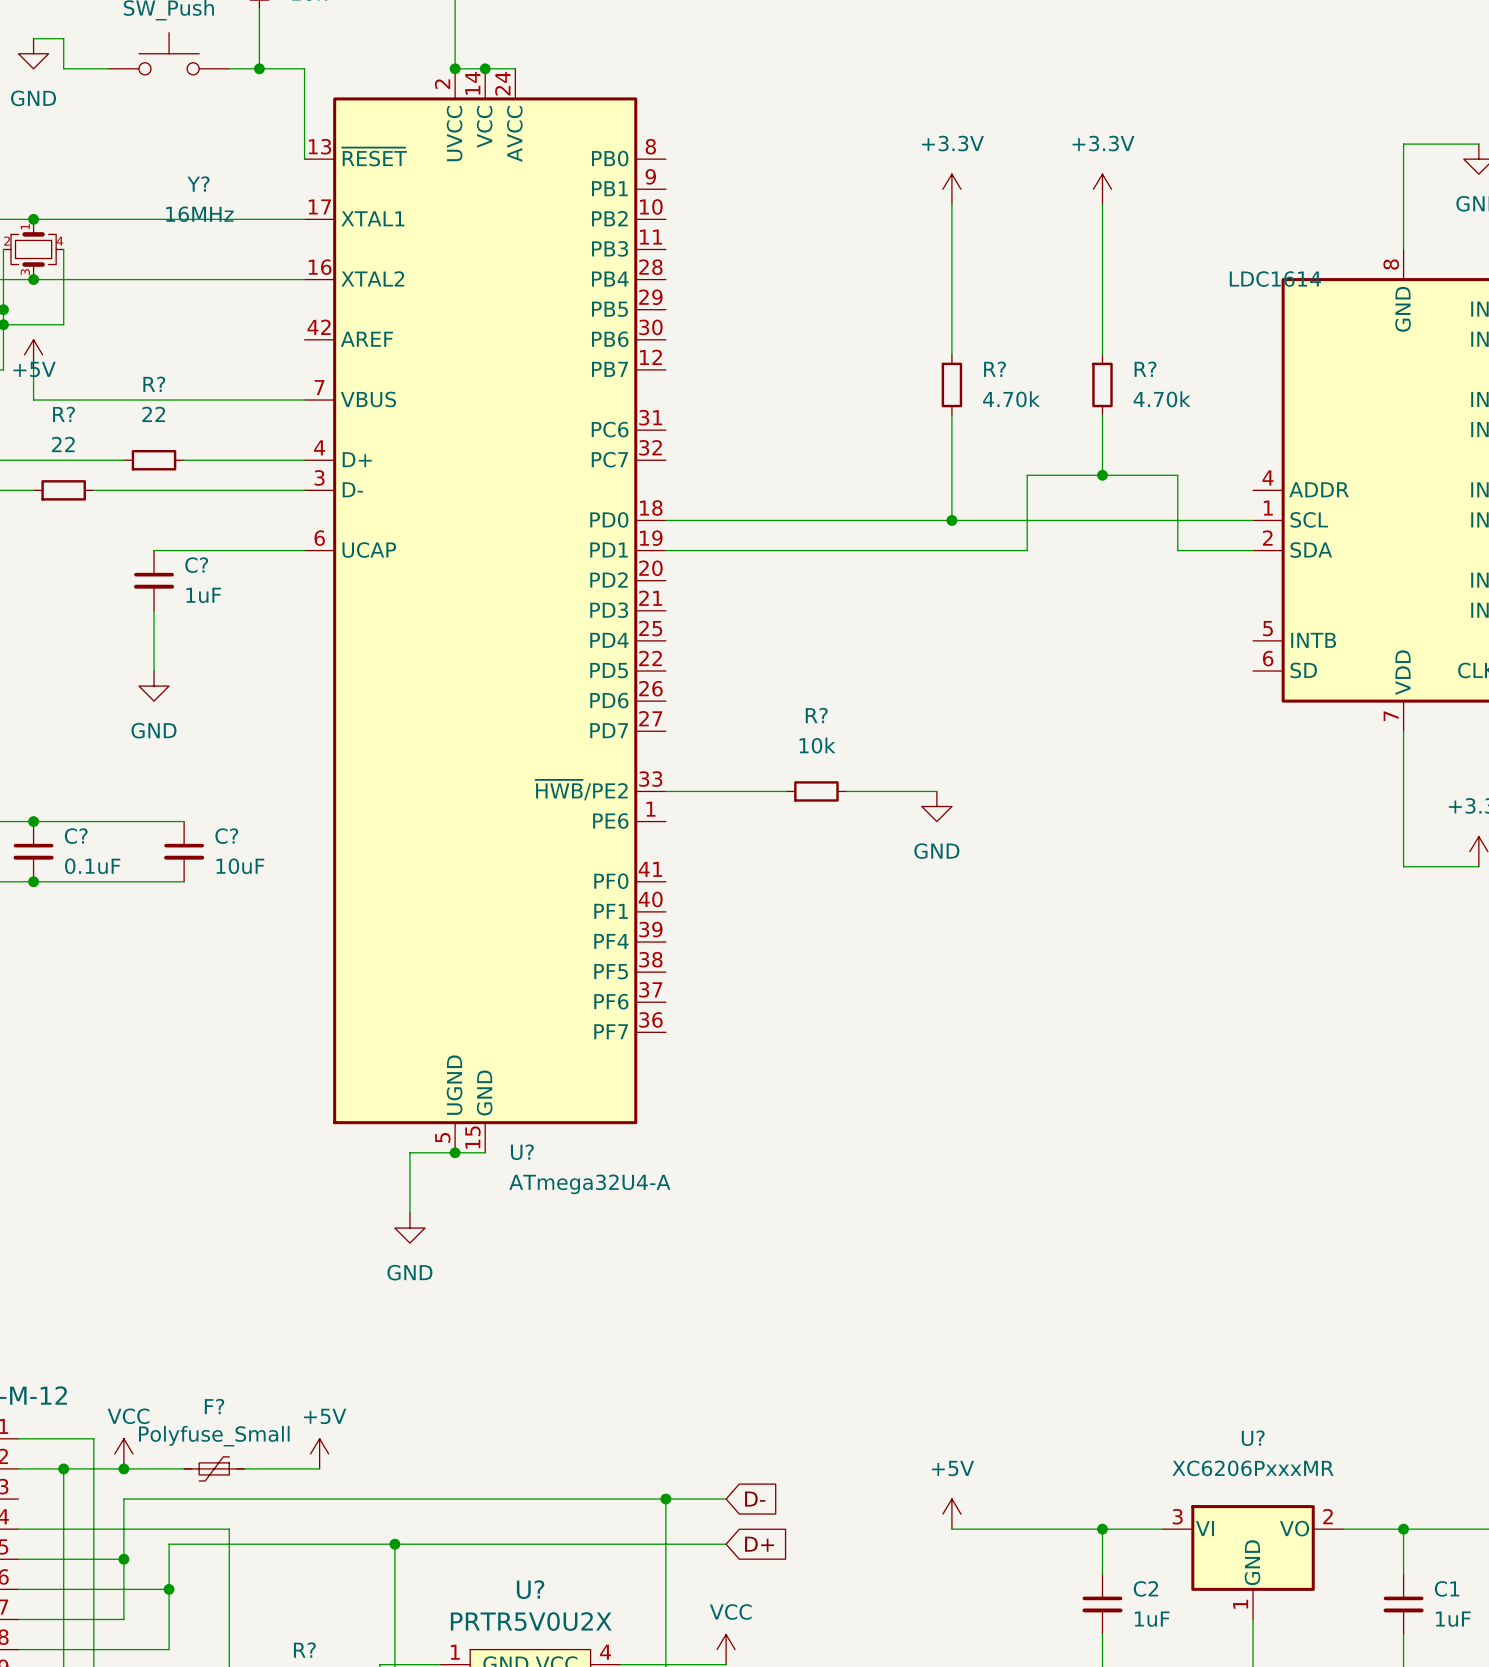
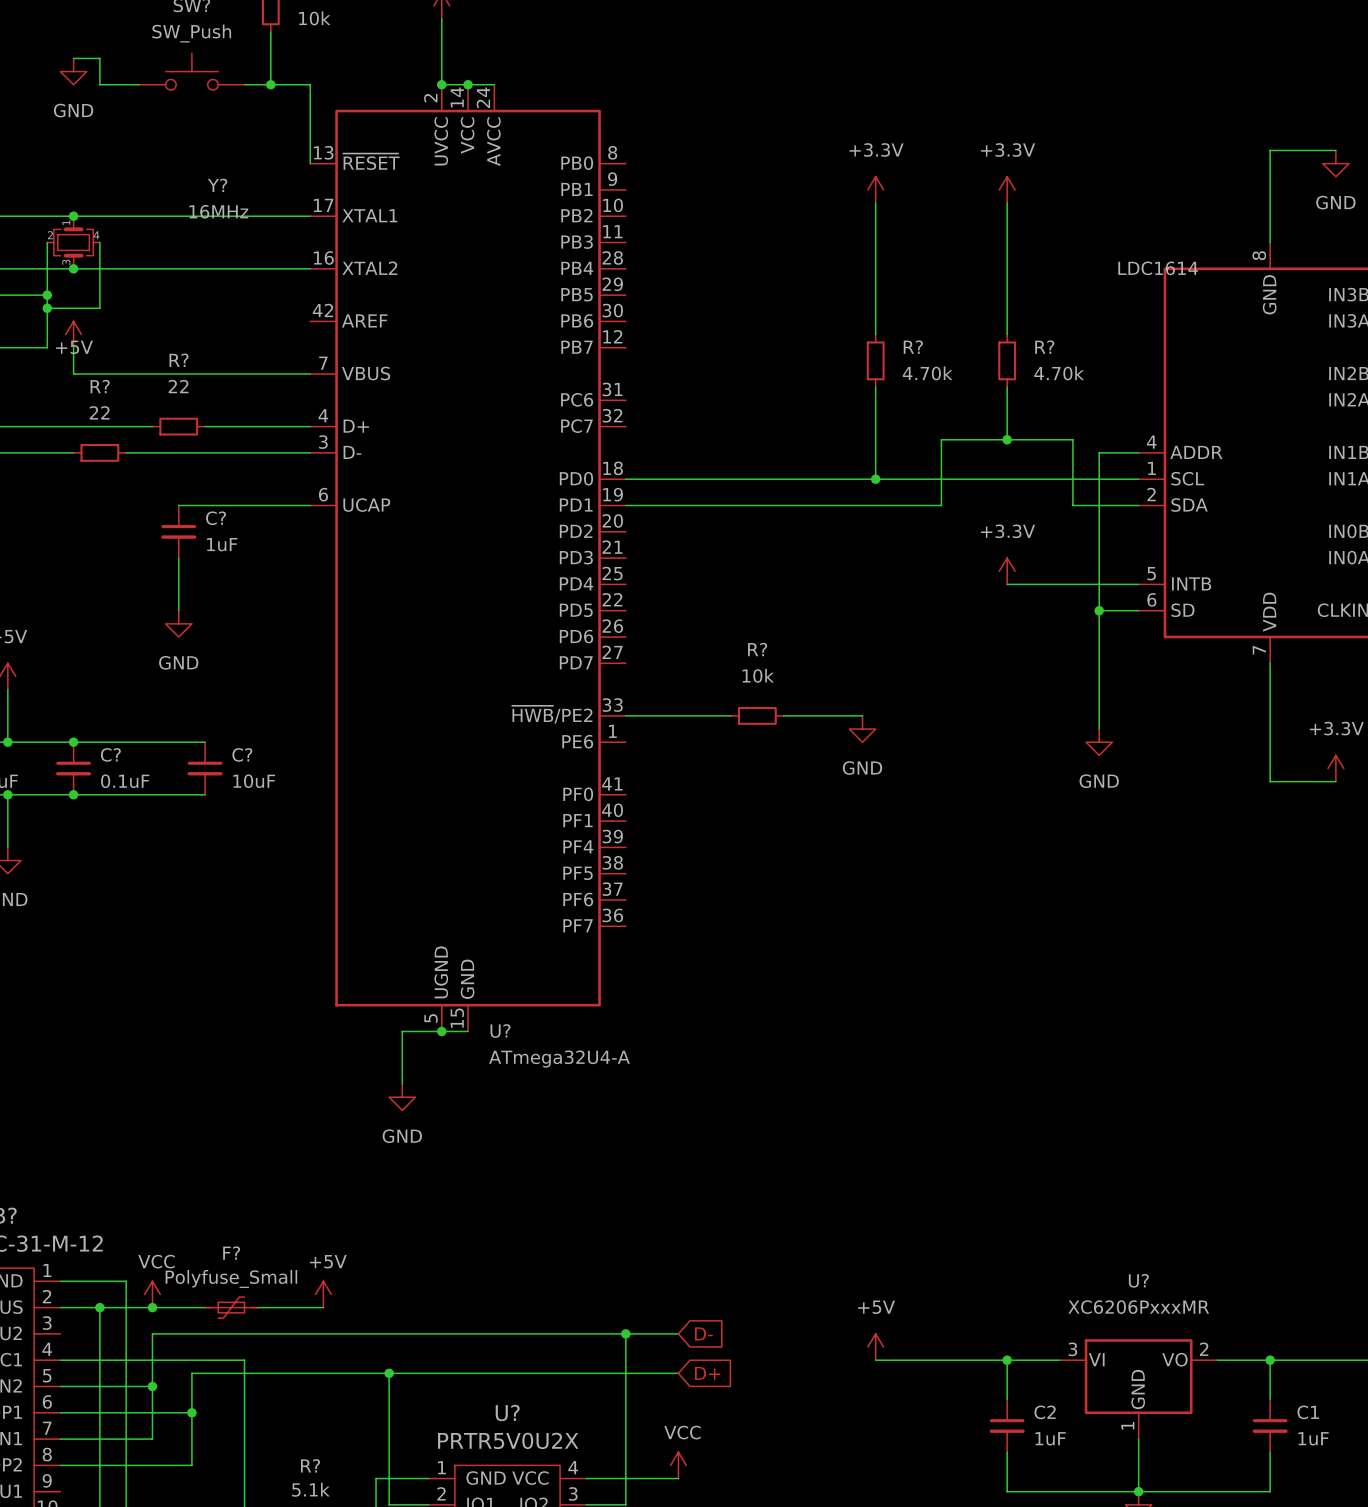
wire: none -> (1138, 452) (1099, 452) (1099, 729)
power symbol: none -> +3.3V (1007, 571)
wire: none -> (1007, 584) (1138, 584)
wire: none -> (1099, 610) (1138, 610)
junction: none -> (1099, 610)
power symbol: none -> GND (1099, 742)

